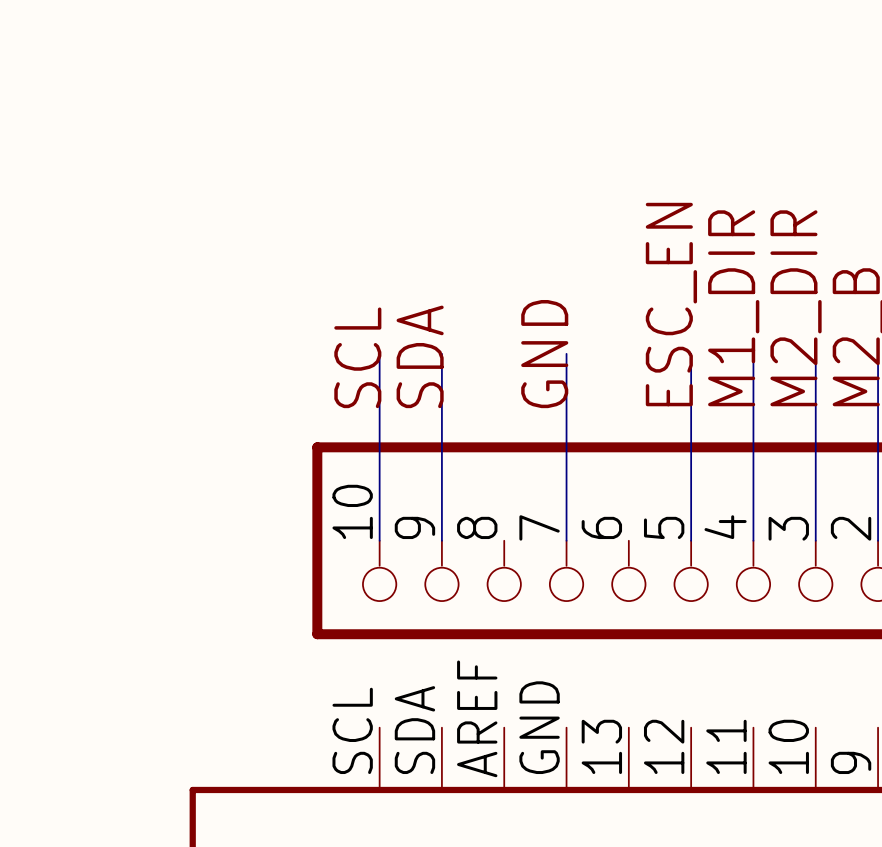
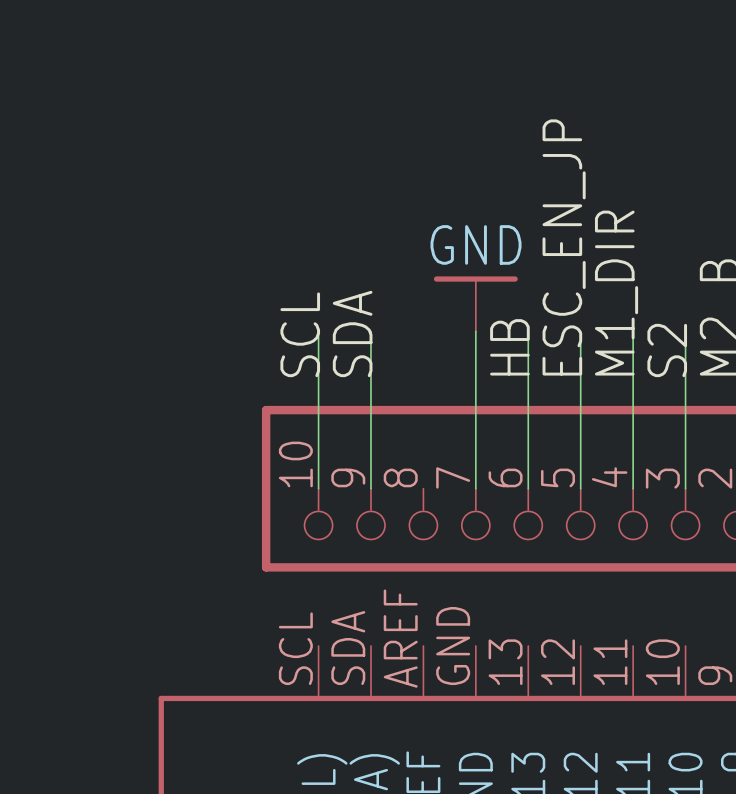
label: ESC_EN (671, 304) -> ESC_EN_JP (564, 247)
label: M2_DIR (796, 308) -> S2 (667, 350)
power symbol: none -> GND (475, 303)
wire: none -> (528, 331) (528, 488)
label: GND (544, 354) -> none
label: none -> HB (509, 347)

